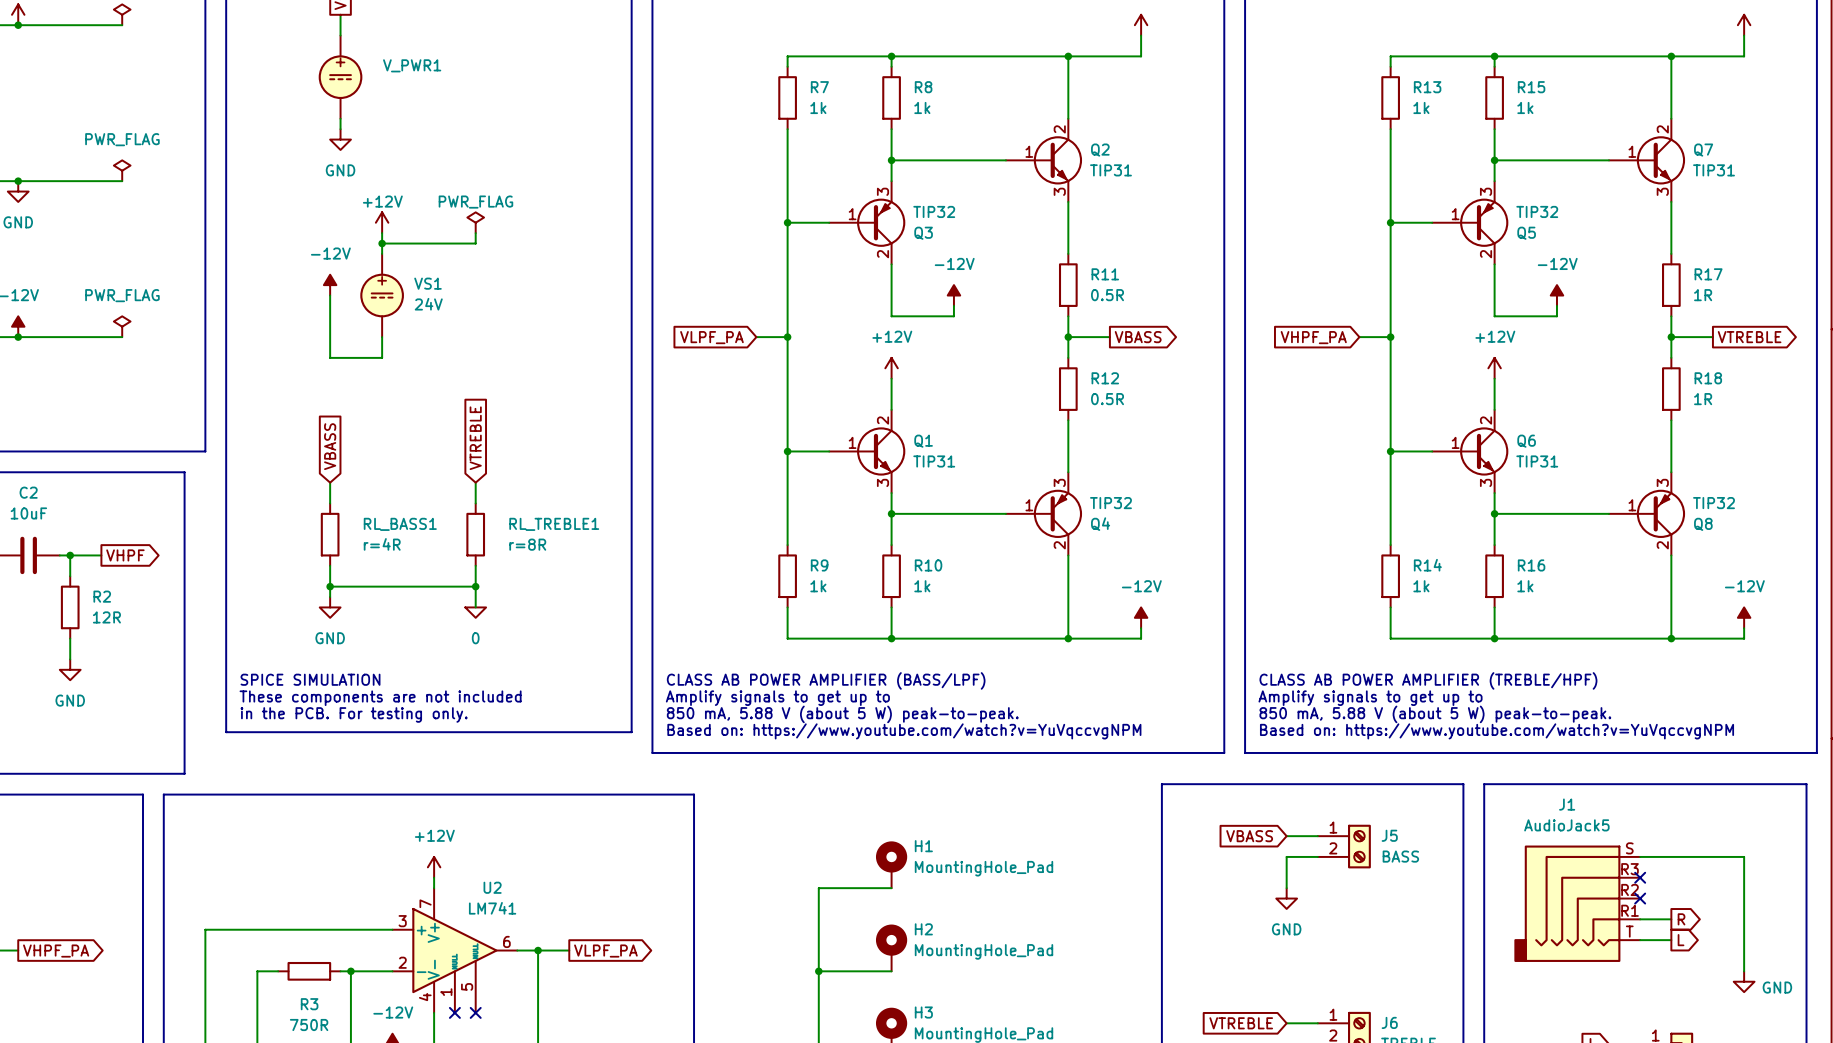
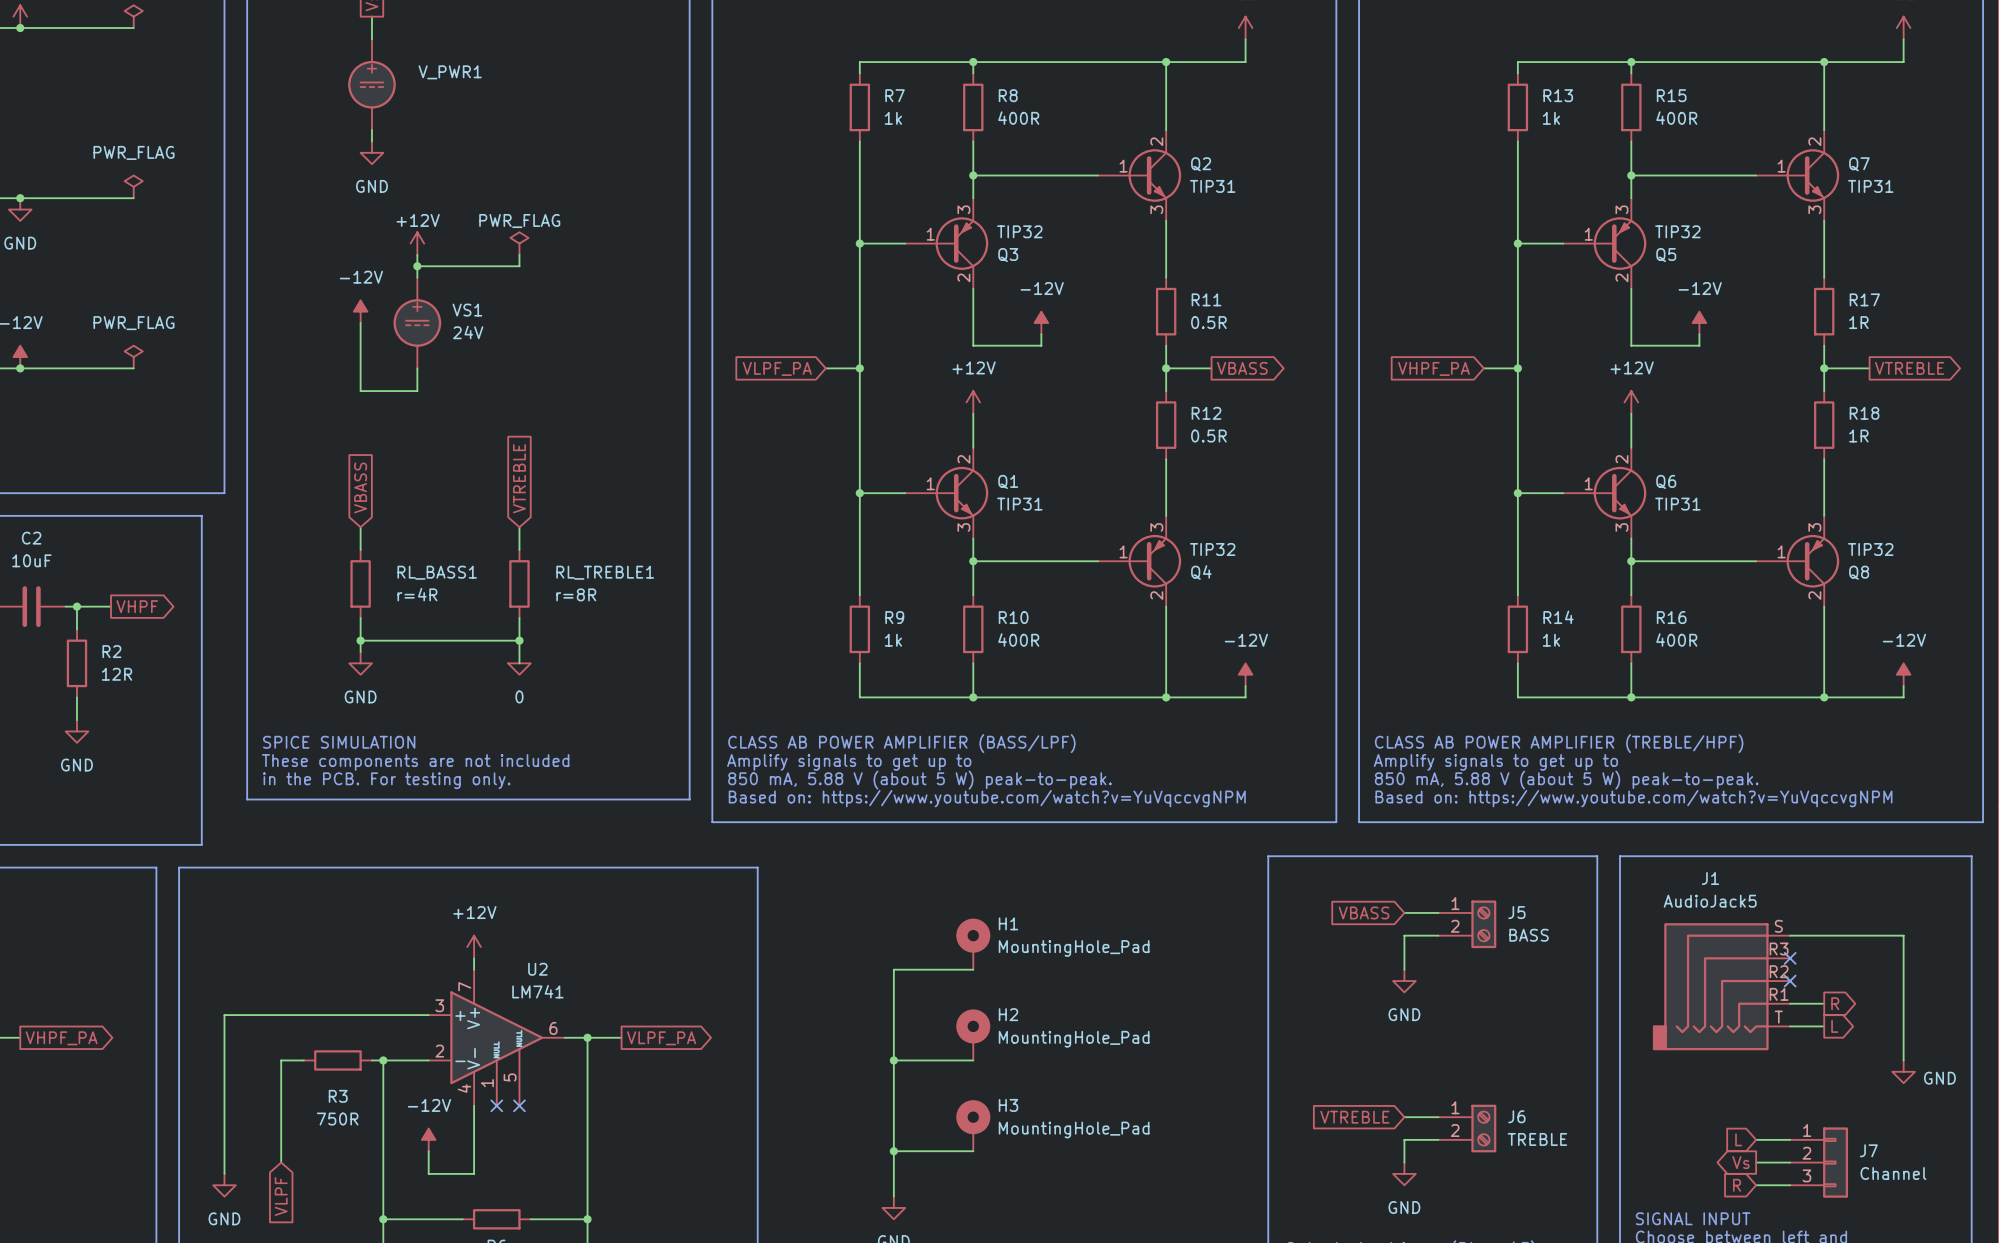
R8 value: 1k (922, 107) -> 400R (1018, 118)
R15 value: 1k (1525, 107) -> 400R (1676, 118)
R10 value: 1k (922, 586) -> 400R (1018, 639)
R16 value: 1k (1525, 586) -> 400R (1676, 639)

